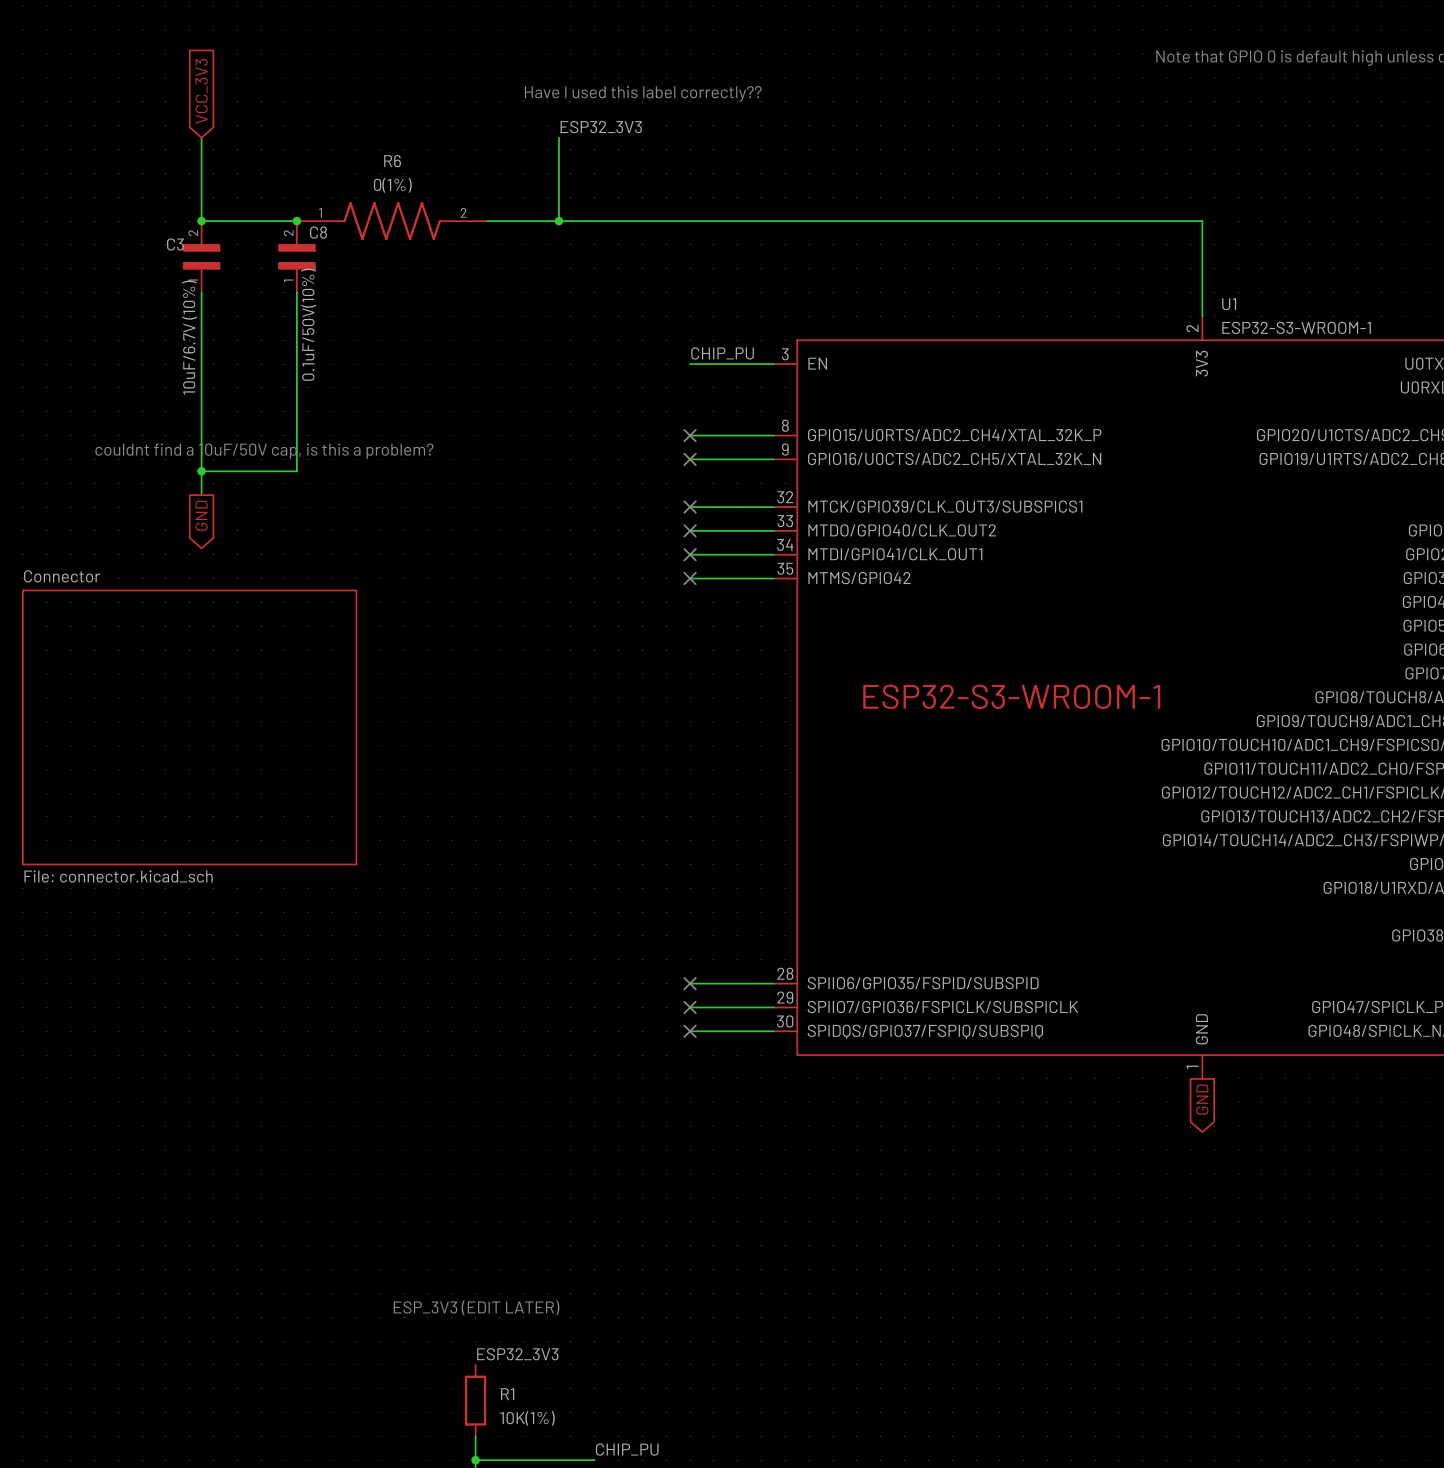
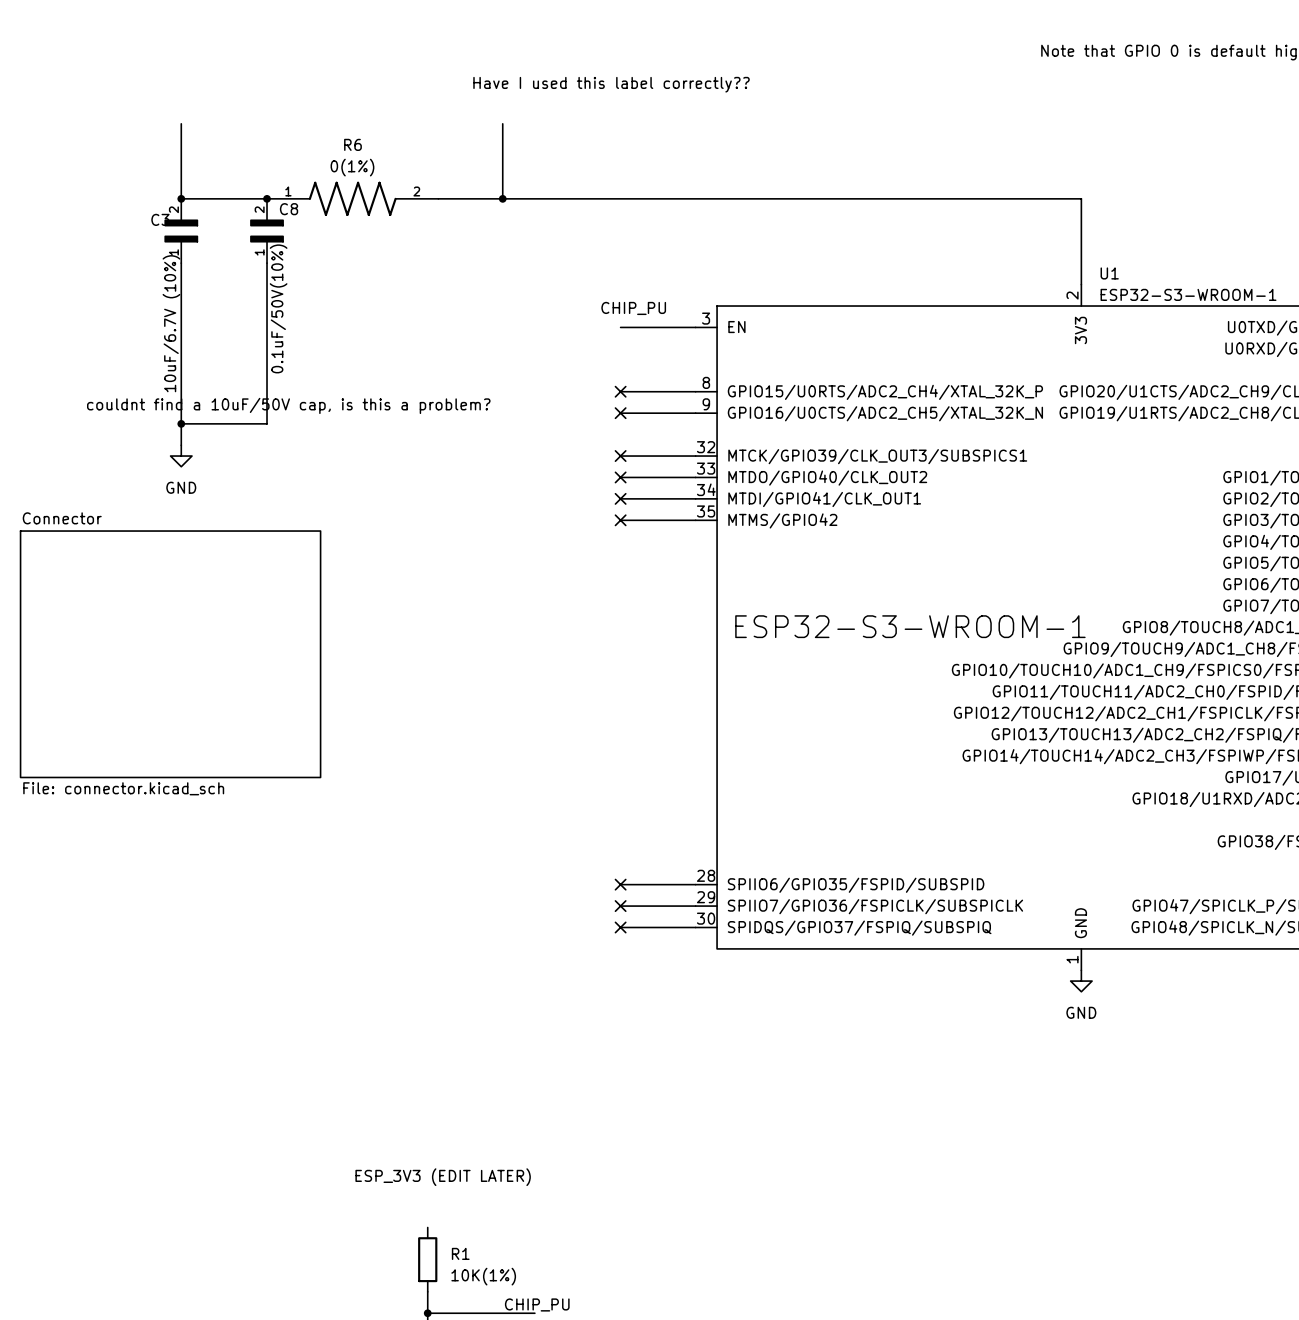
global label: VCC_3V3 (201, 91) -> none
label: ESP32_3V3 (601, 127) -> none
text: none -> CHIP_PU (633, 308)
label: CHIP_PU (722, 353) -> none
power symbol: none -> GND (181, 456)
global label: GND (201, 515) -> none
power symbol: none -> GND (1081, 981)
global label: GND (1202, 1099) -> none
label: ESP32_3V3 (517, 1354) -> none
label: CHIP_PU (627, 1449) -> none
text: none -> CHIP_PU (537, 1304)

